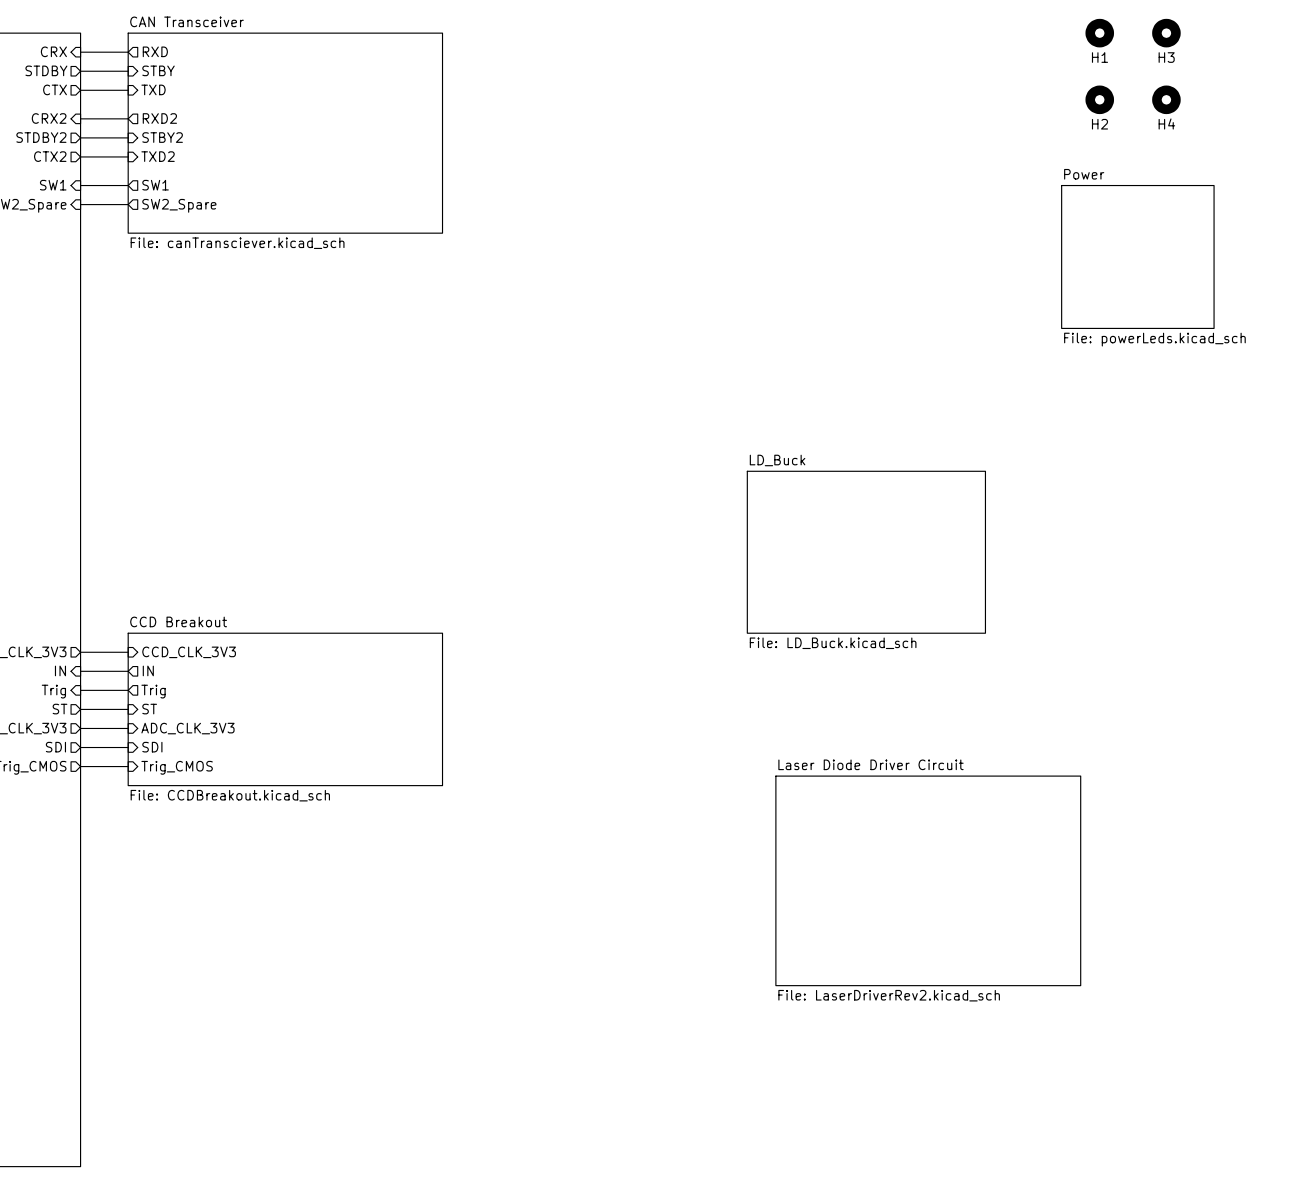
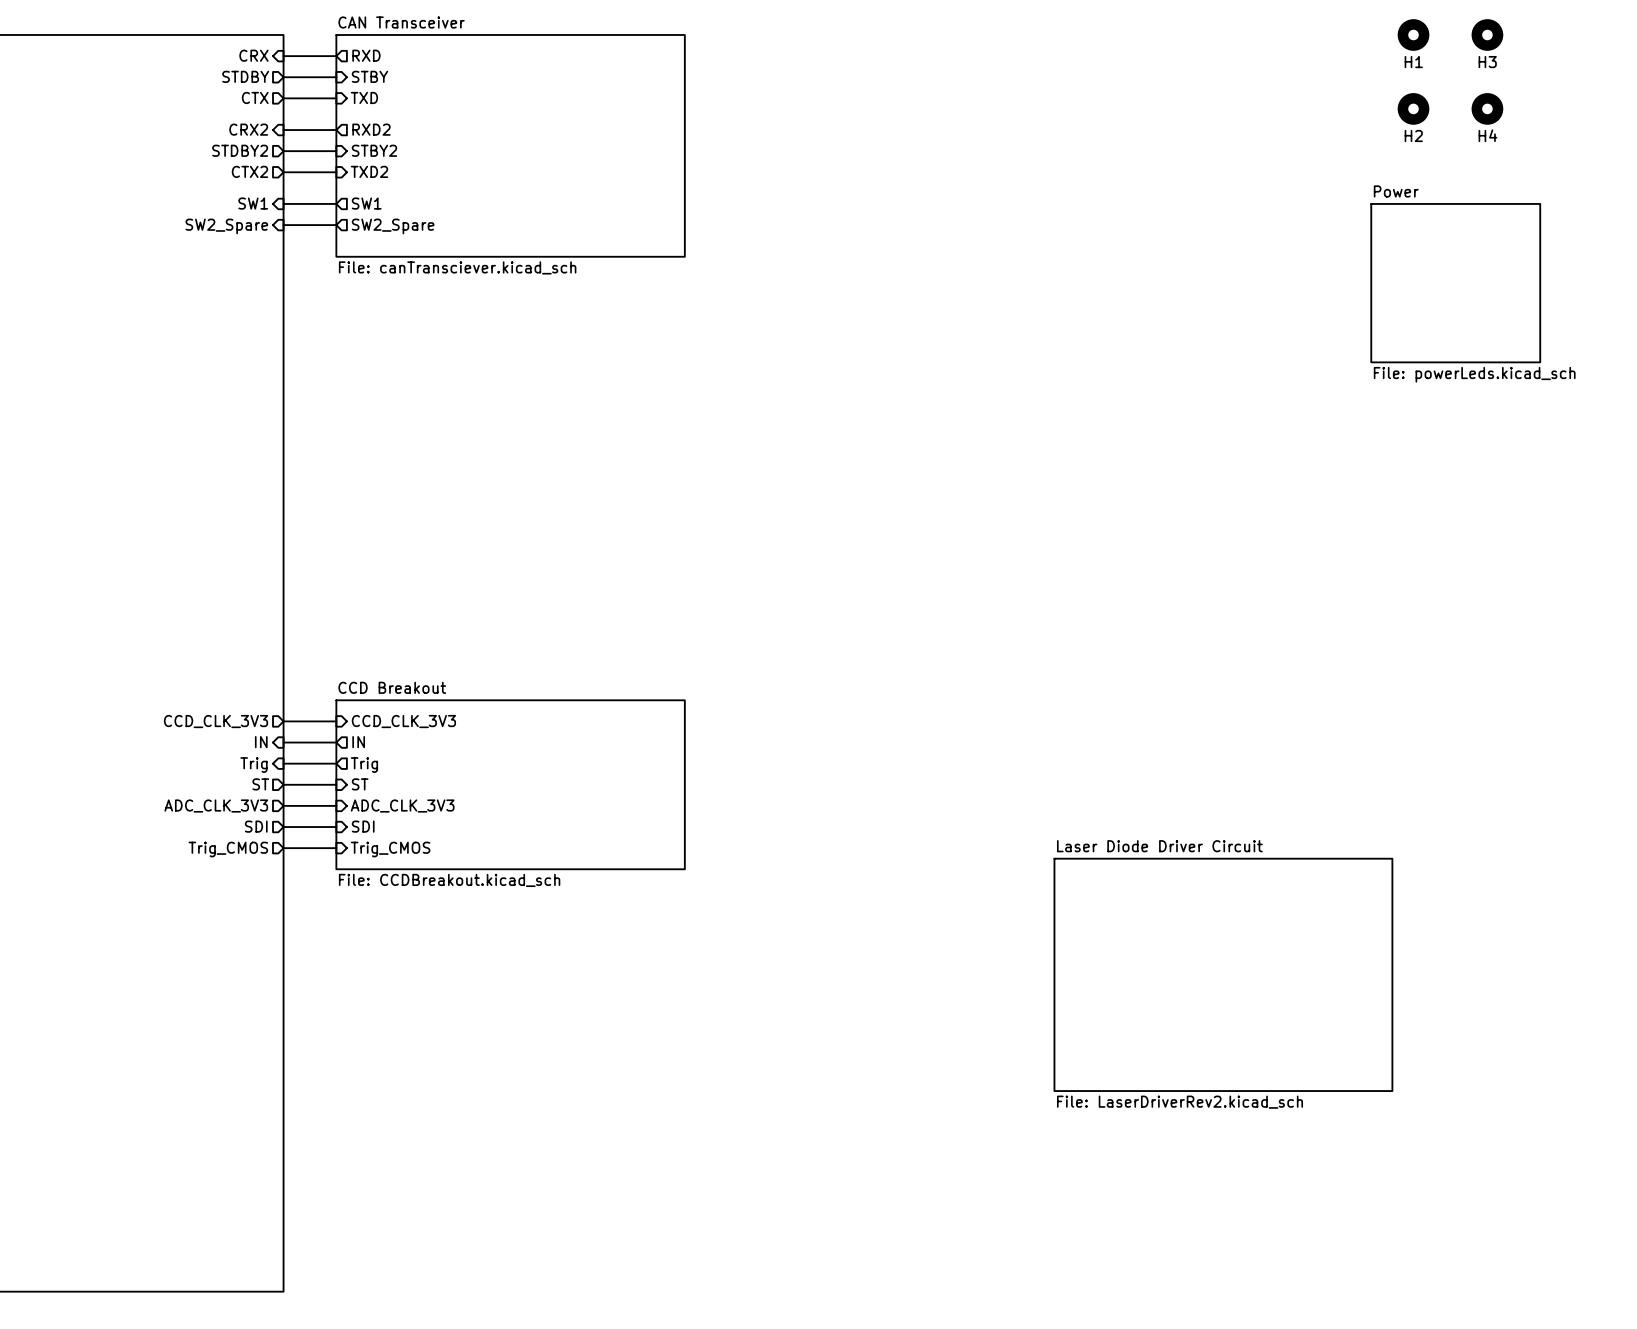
sheet LD_Buck: File: LD_Buck.kicad_sch (866, 552) -> none

